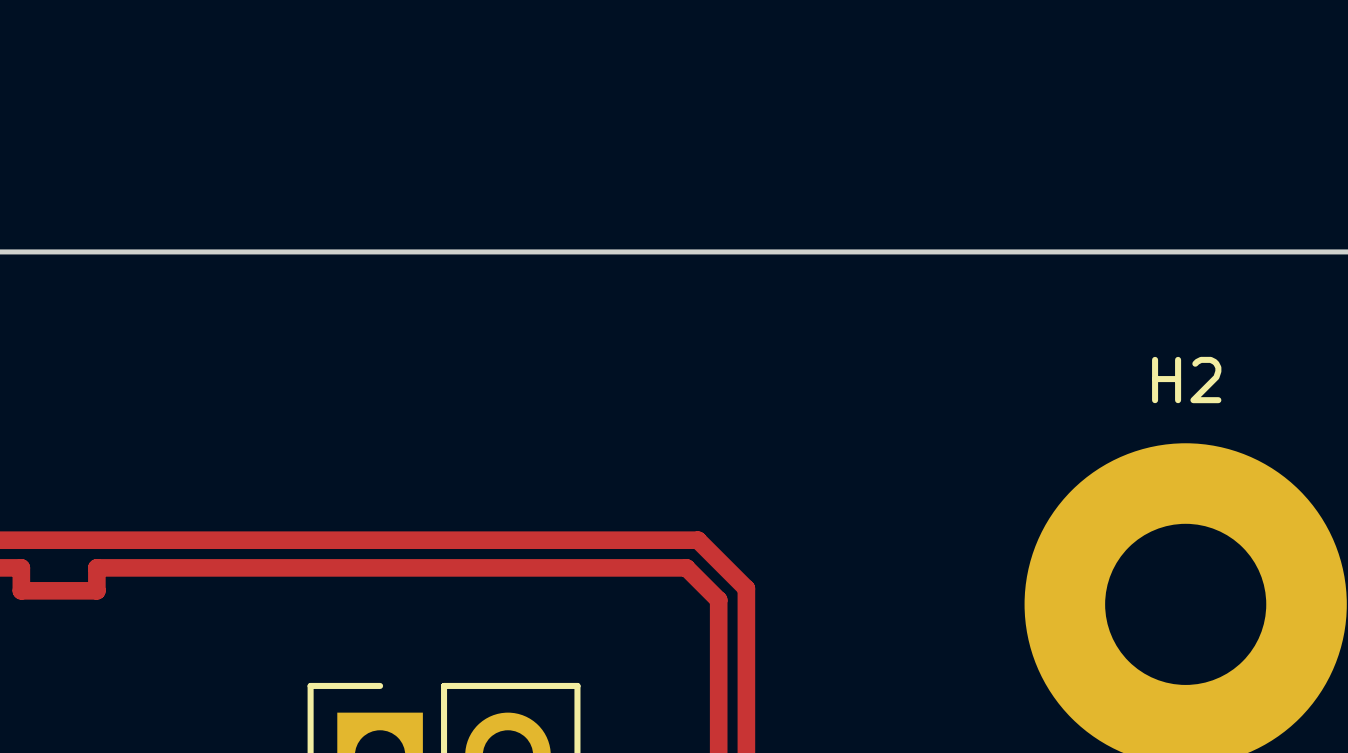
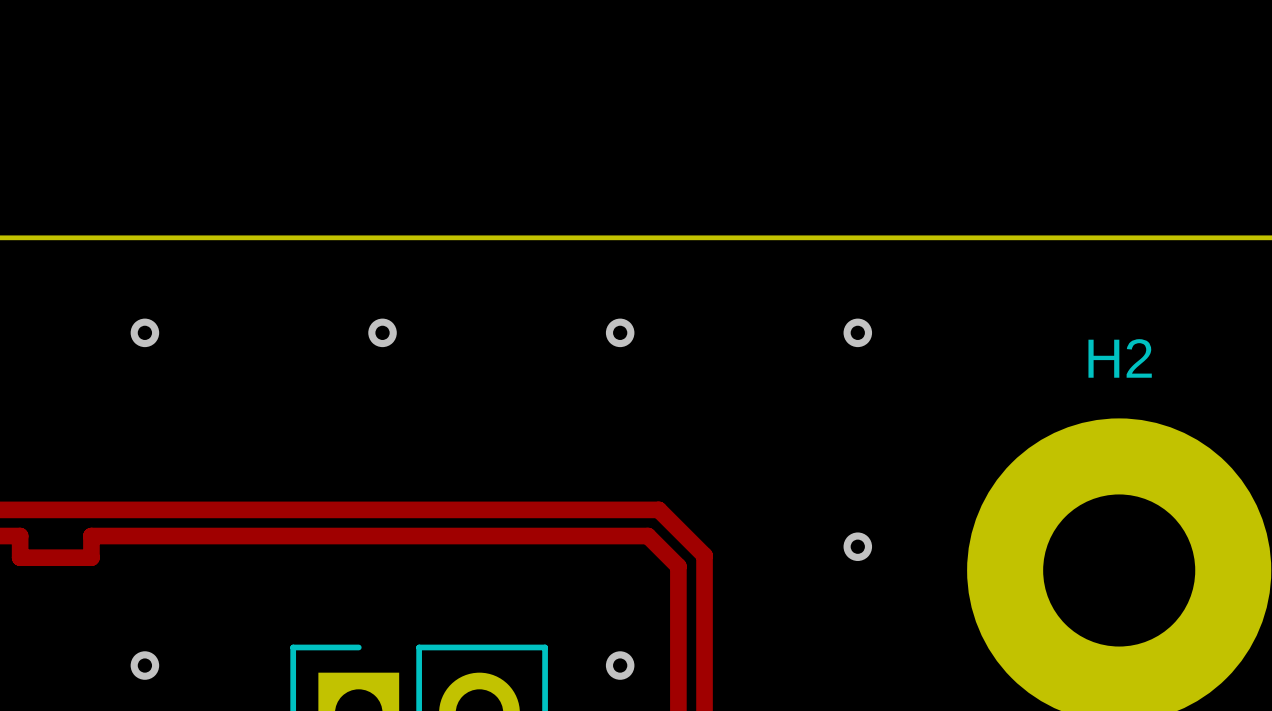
via: none -> (144, 332)
via: none -> (382, 332)
via: none -> (620, 332)
via: none -> (857, 332)
via: none -> (857, 546)
via: none -> (144, 665)
via: none -> (620, 665)

